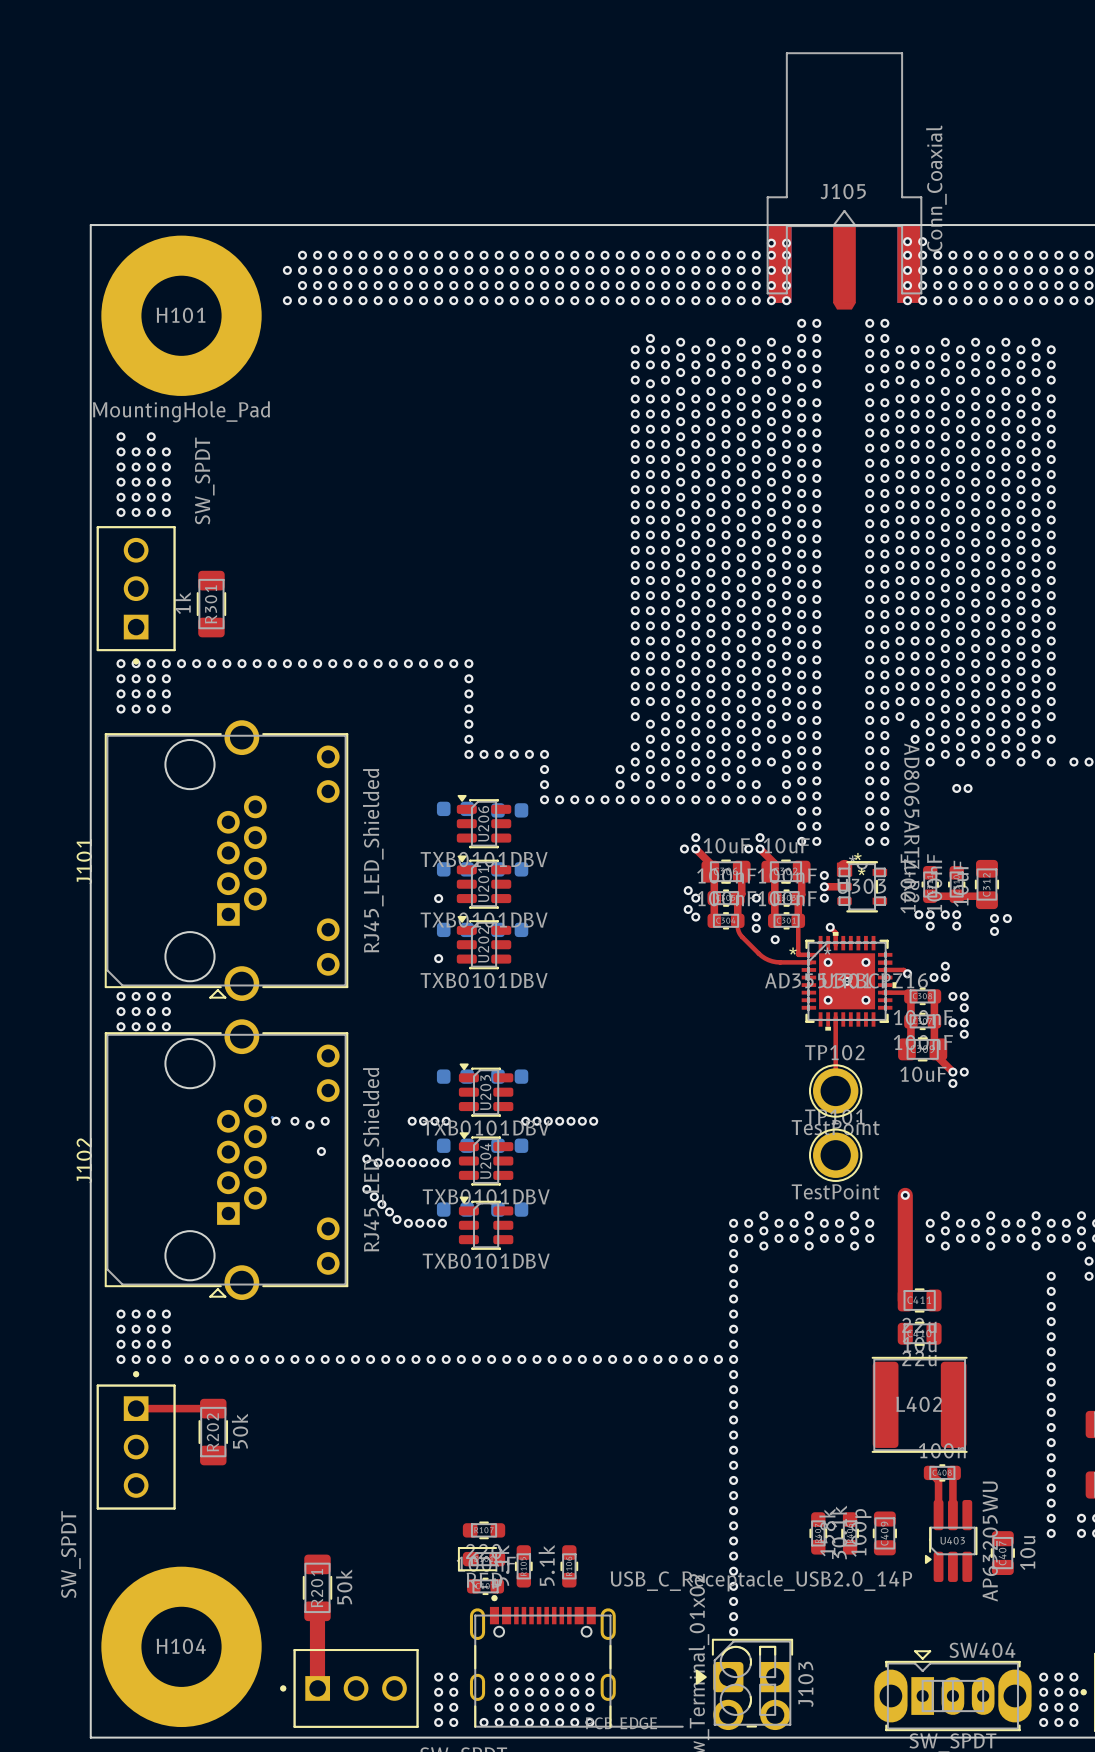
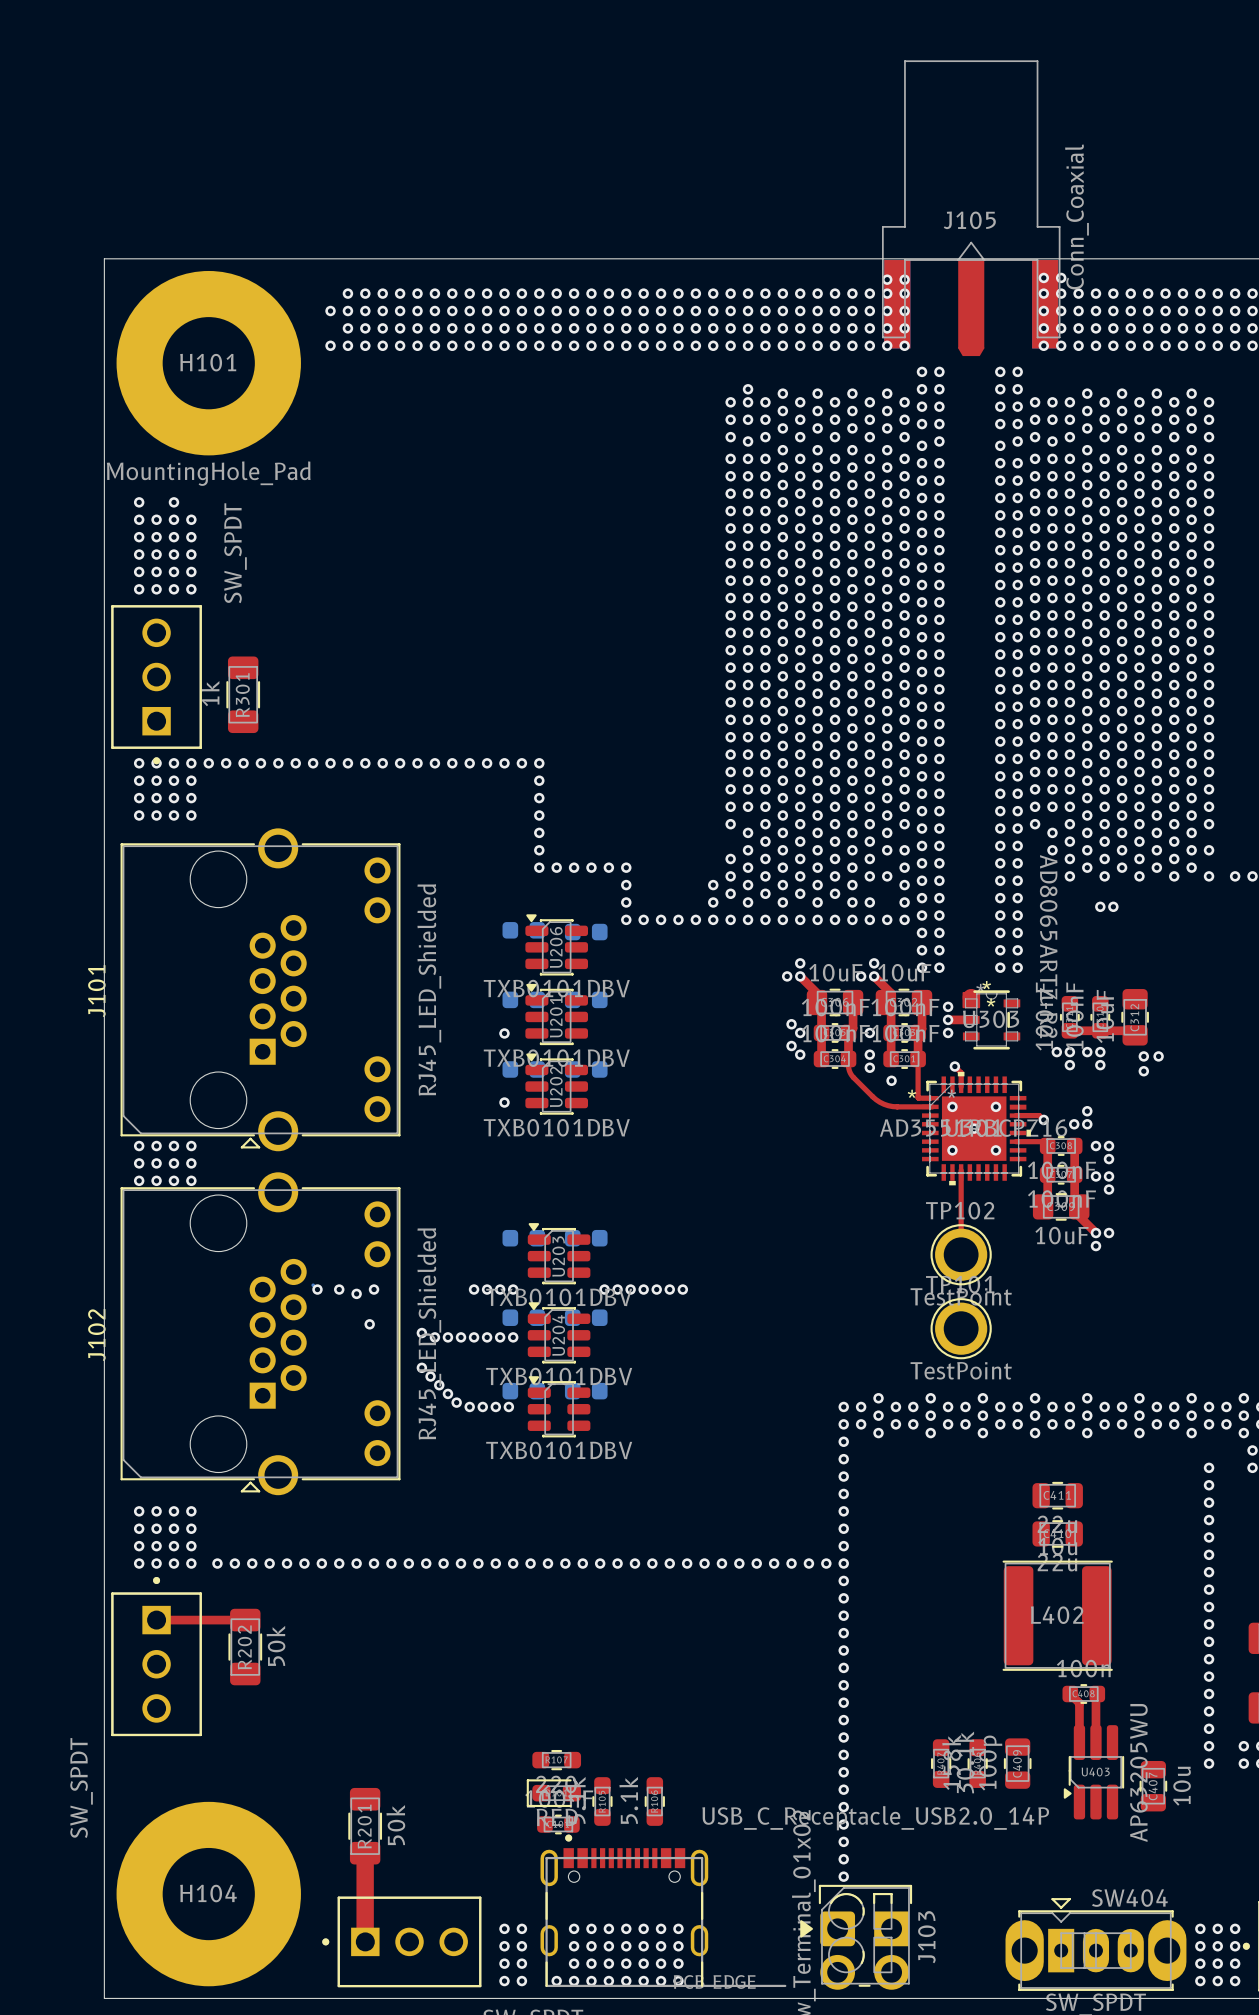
top track: (905, 1195) (905, 1300) -> none
via: (905, 1195) -> none
via: none -> (1035, 1398)
via: none -> (1017, 1406)
via: none -> (1052, 1406)
via: none -> (1035, 1415)
via: none -> (1017, 1424)
via: none -> (1052, 1424)
via: none -> (1035, 1433)

